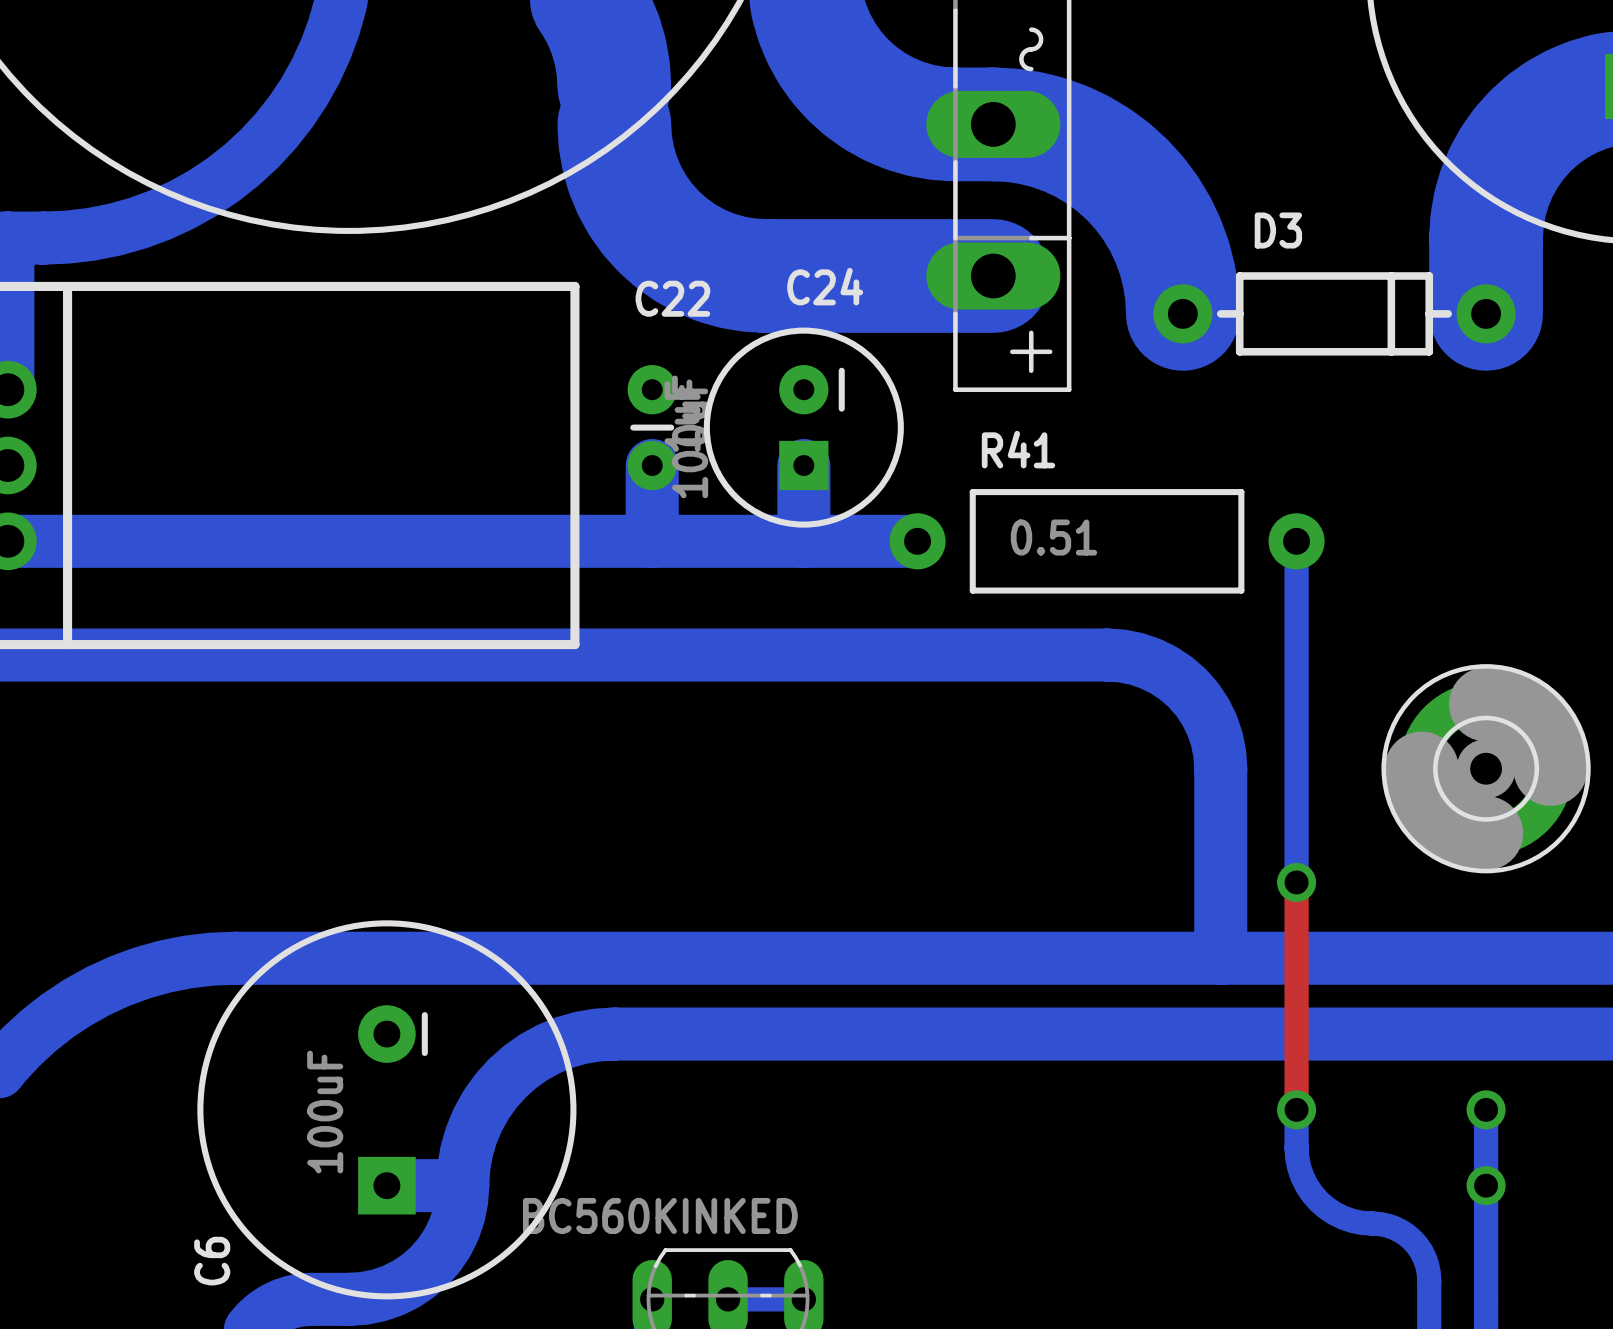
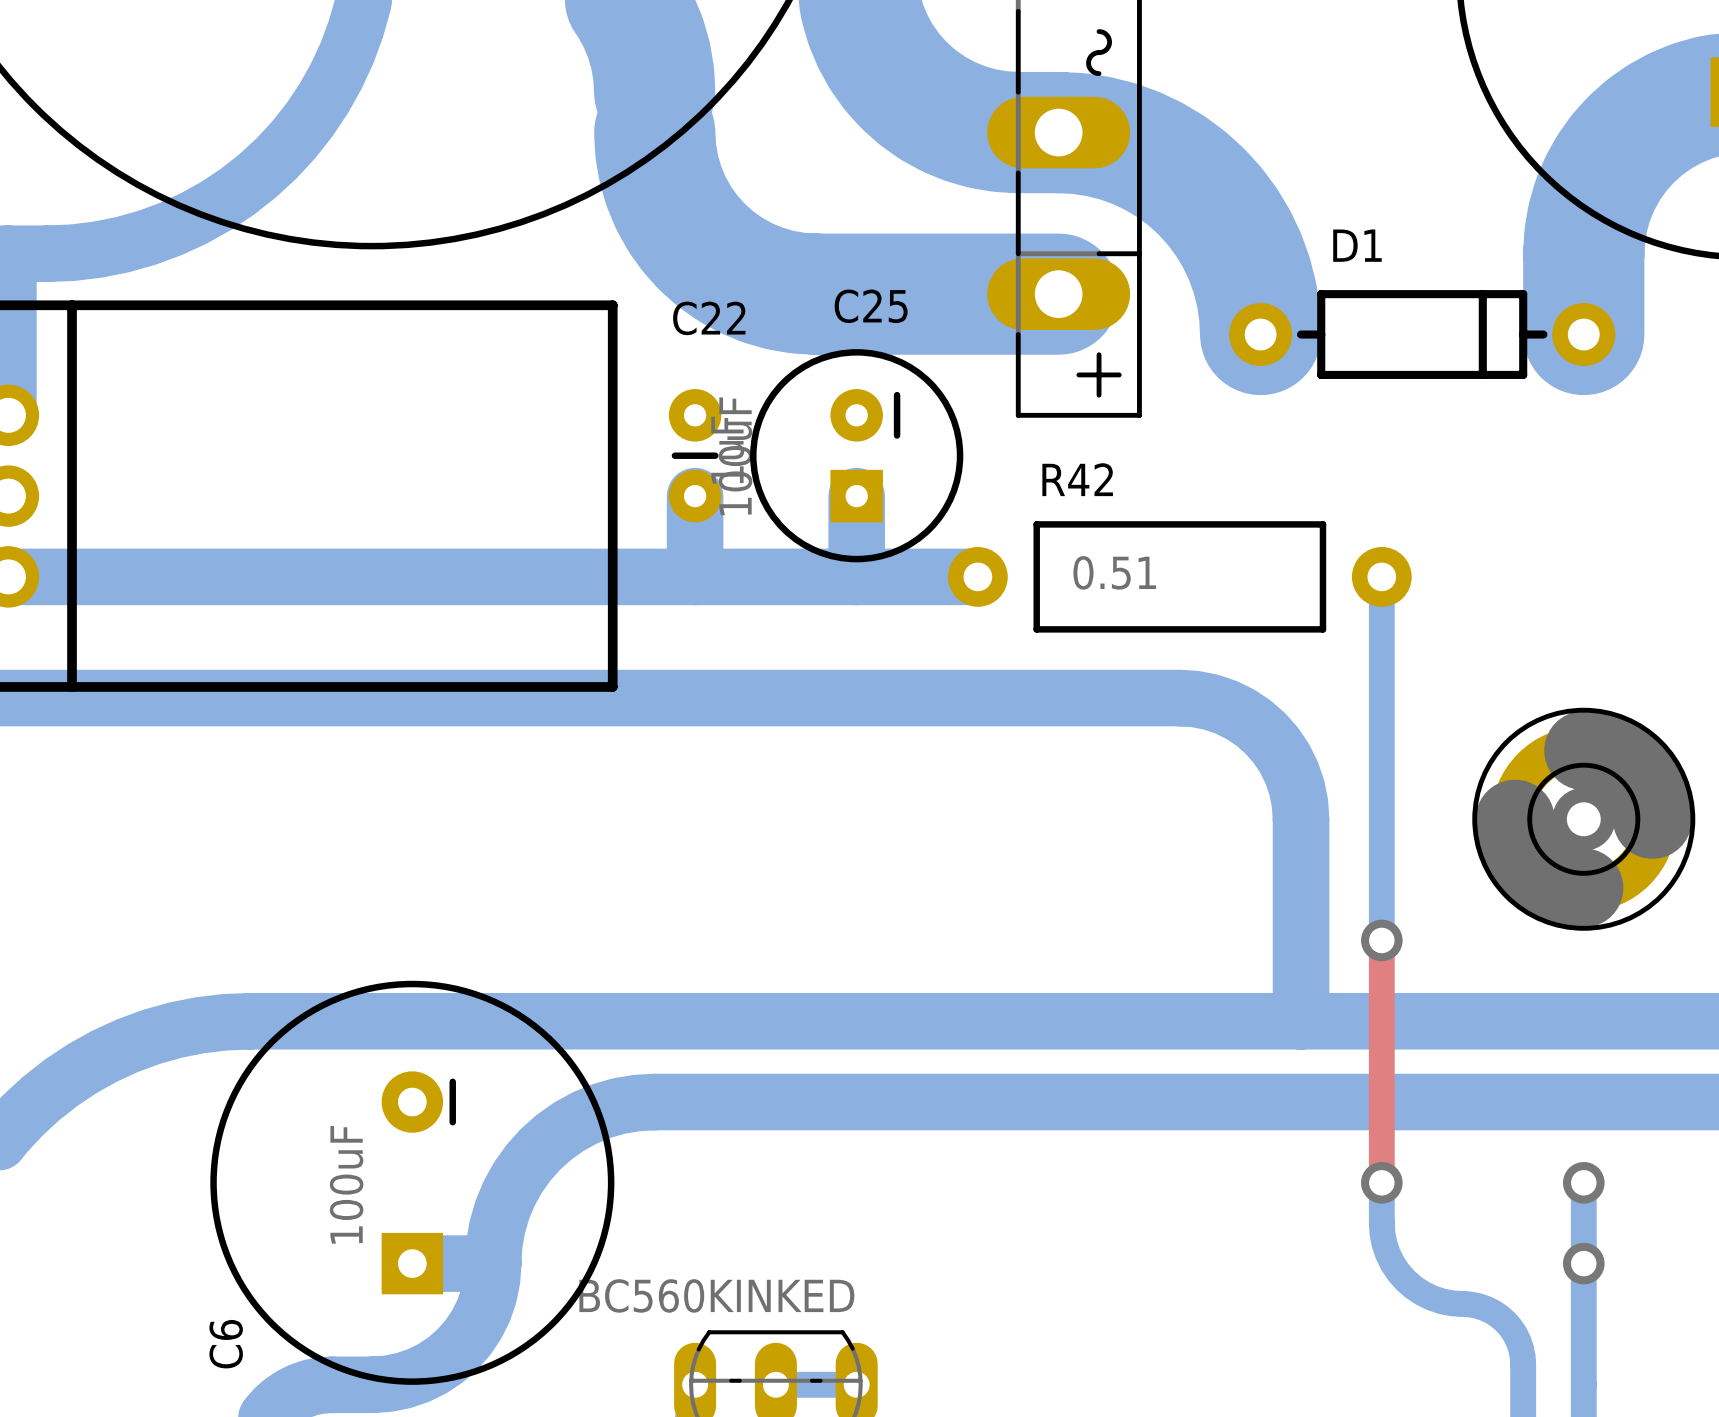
D3 name: D3 (1278, 230) -> D1 (1357, 245)
C24 name: C24 (825, 286) -> C25 (871, 306)
R41 name: R41 (1018, 449) -> R42 (1077, 479)

